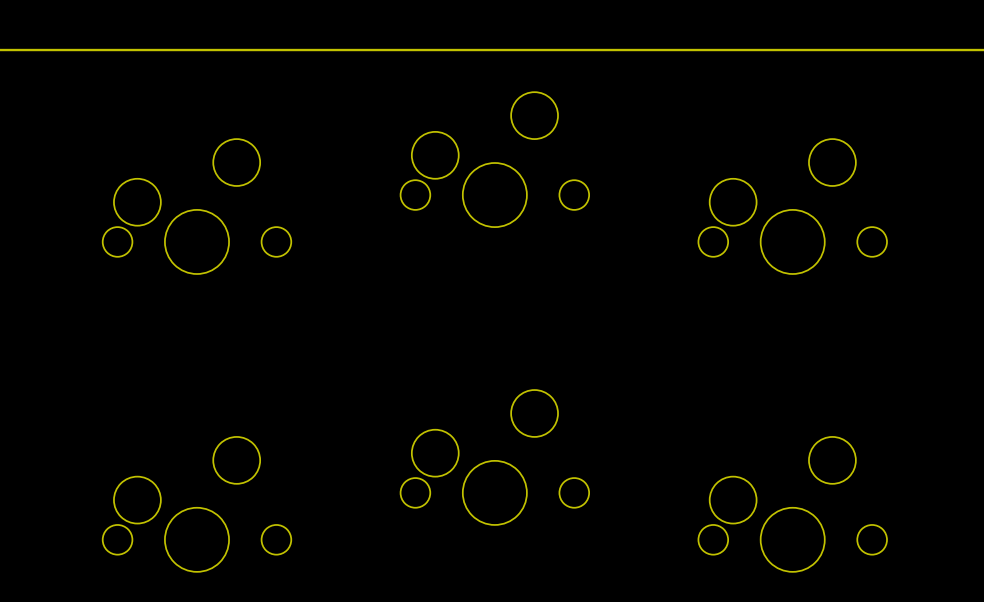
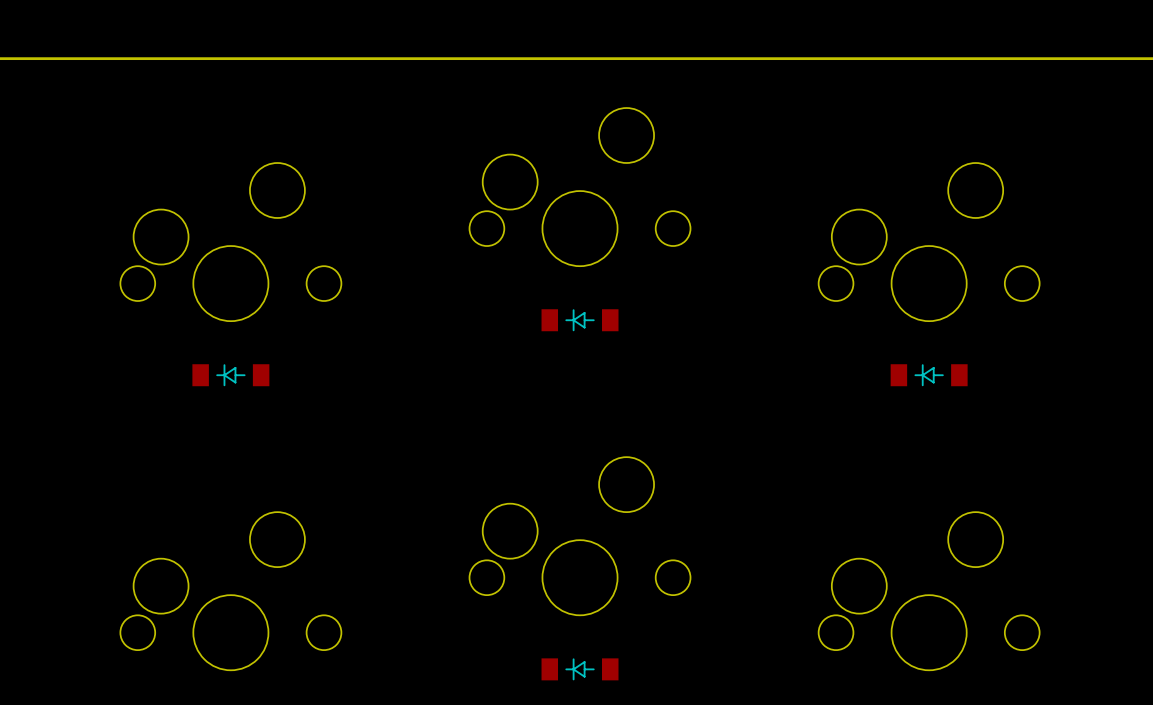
part: none -> (580, 320)
part: none -> (230, 375)
part: none -> (929, 375)
part: none -> (580, 669)

